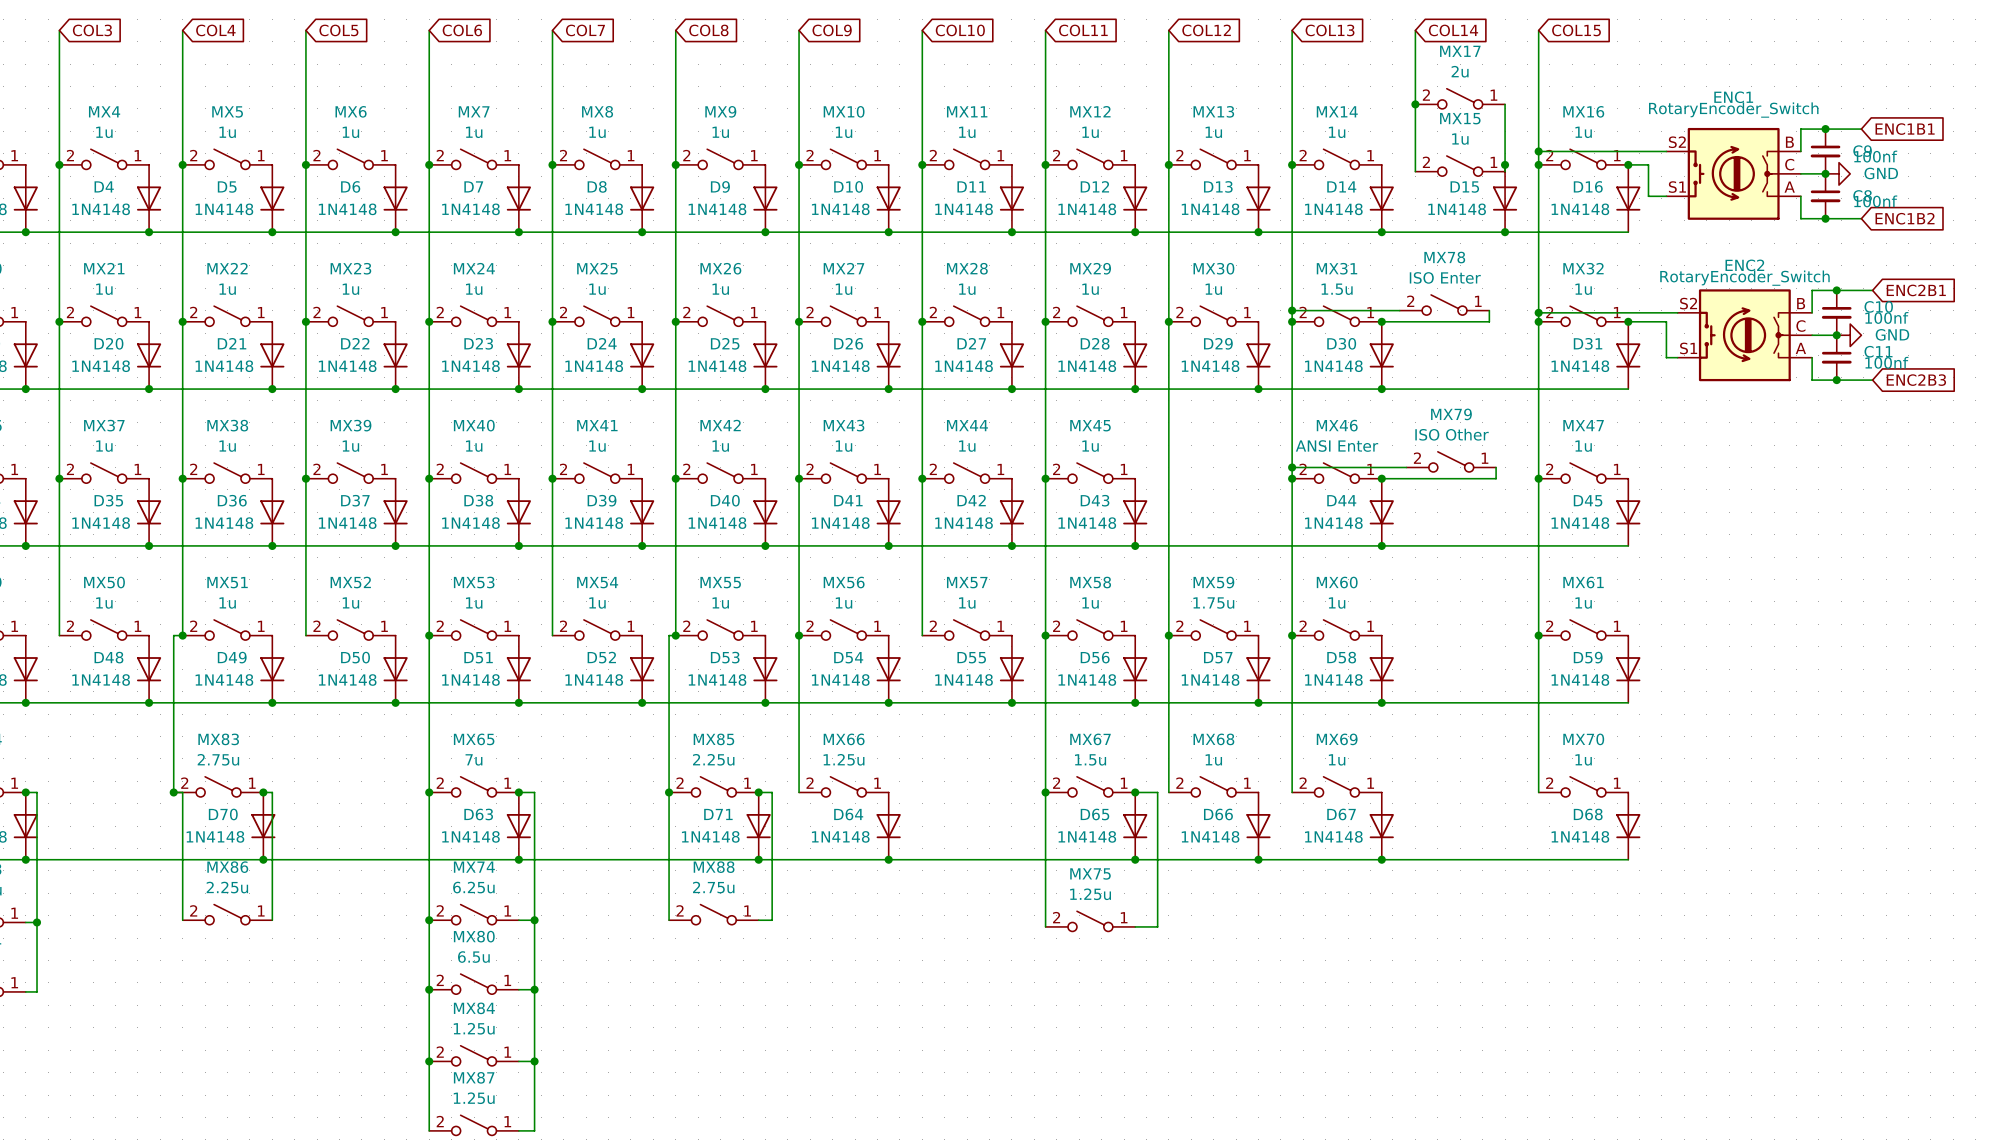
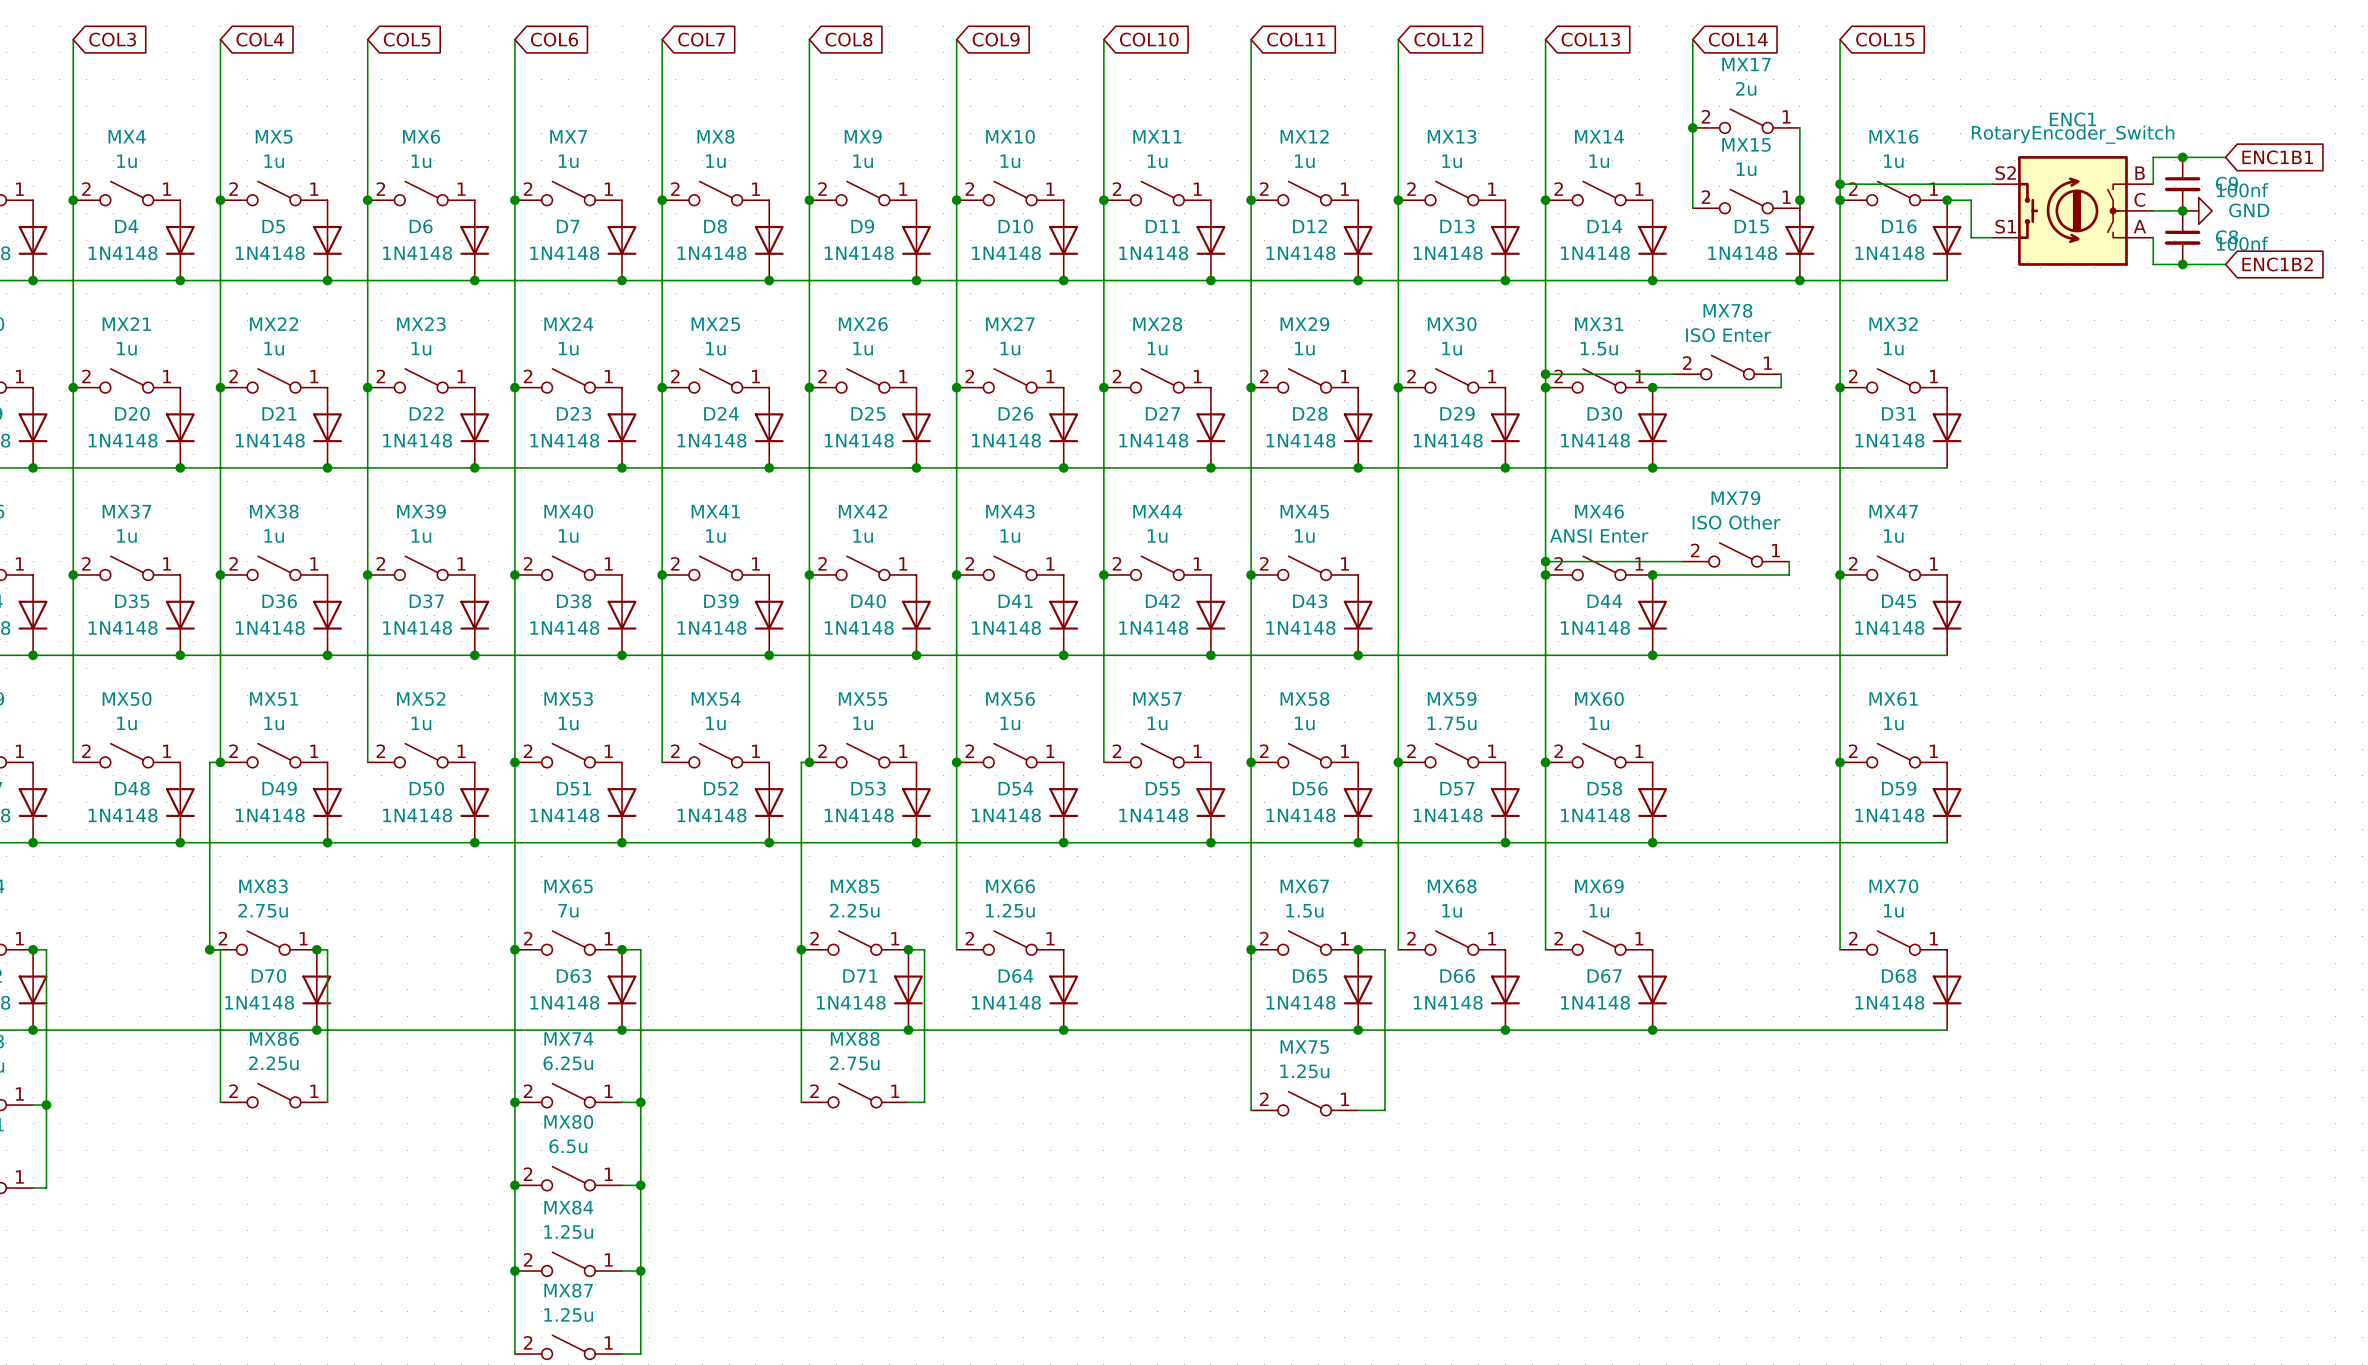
junction: (1836, 290) -> none
wire: (1872, 290) (1812, 290) (1812, 312) -> none
global label: ENC2B1 (1916, 290) -> none
wire: (1538, 312) (1677, 312) -> none
junction: (1538, 312) -> none
C10: 100nf (1836, 312) -> none
wire: (1628, 321) (1666, 321) (1666, 357) (1677, 357) -> none
junction: (1628, 321) -> none
ENC2: RotaryEncoder_Switch (1744, 335) -> none
wire: (1812, 335) (1839, 335) -> none
junction: (1836, 335) -> none
power symbol: GND (1850, 335) -> none
wire: (1812, 357) (1812, 380) (1872, 380) -> none
C11: 100nf (1836, 357) -> none
junction: (1836, 380) -> none
global label: ENC2B3 (1916, 380) -> none

